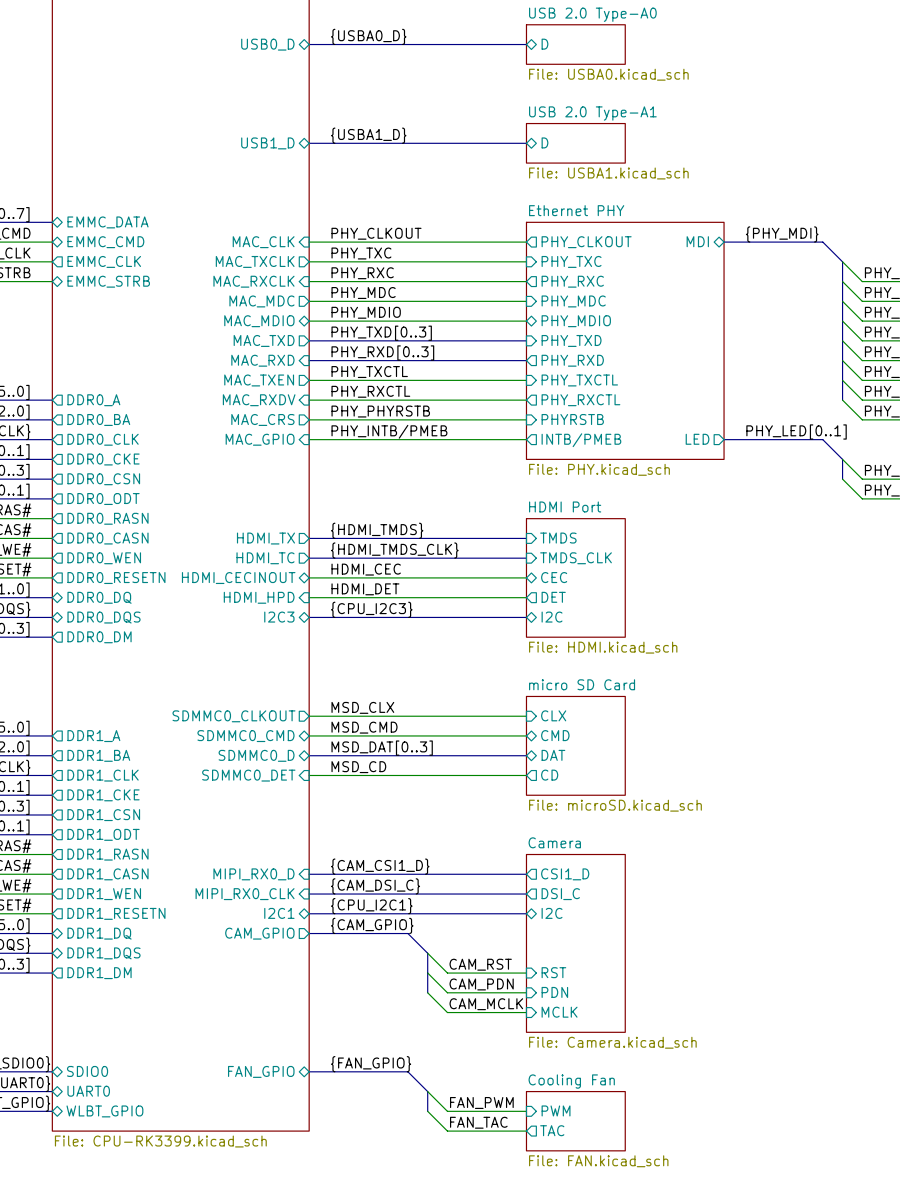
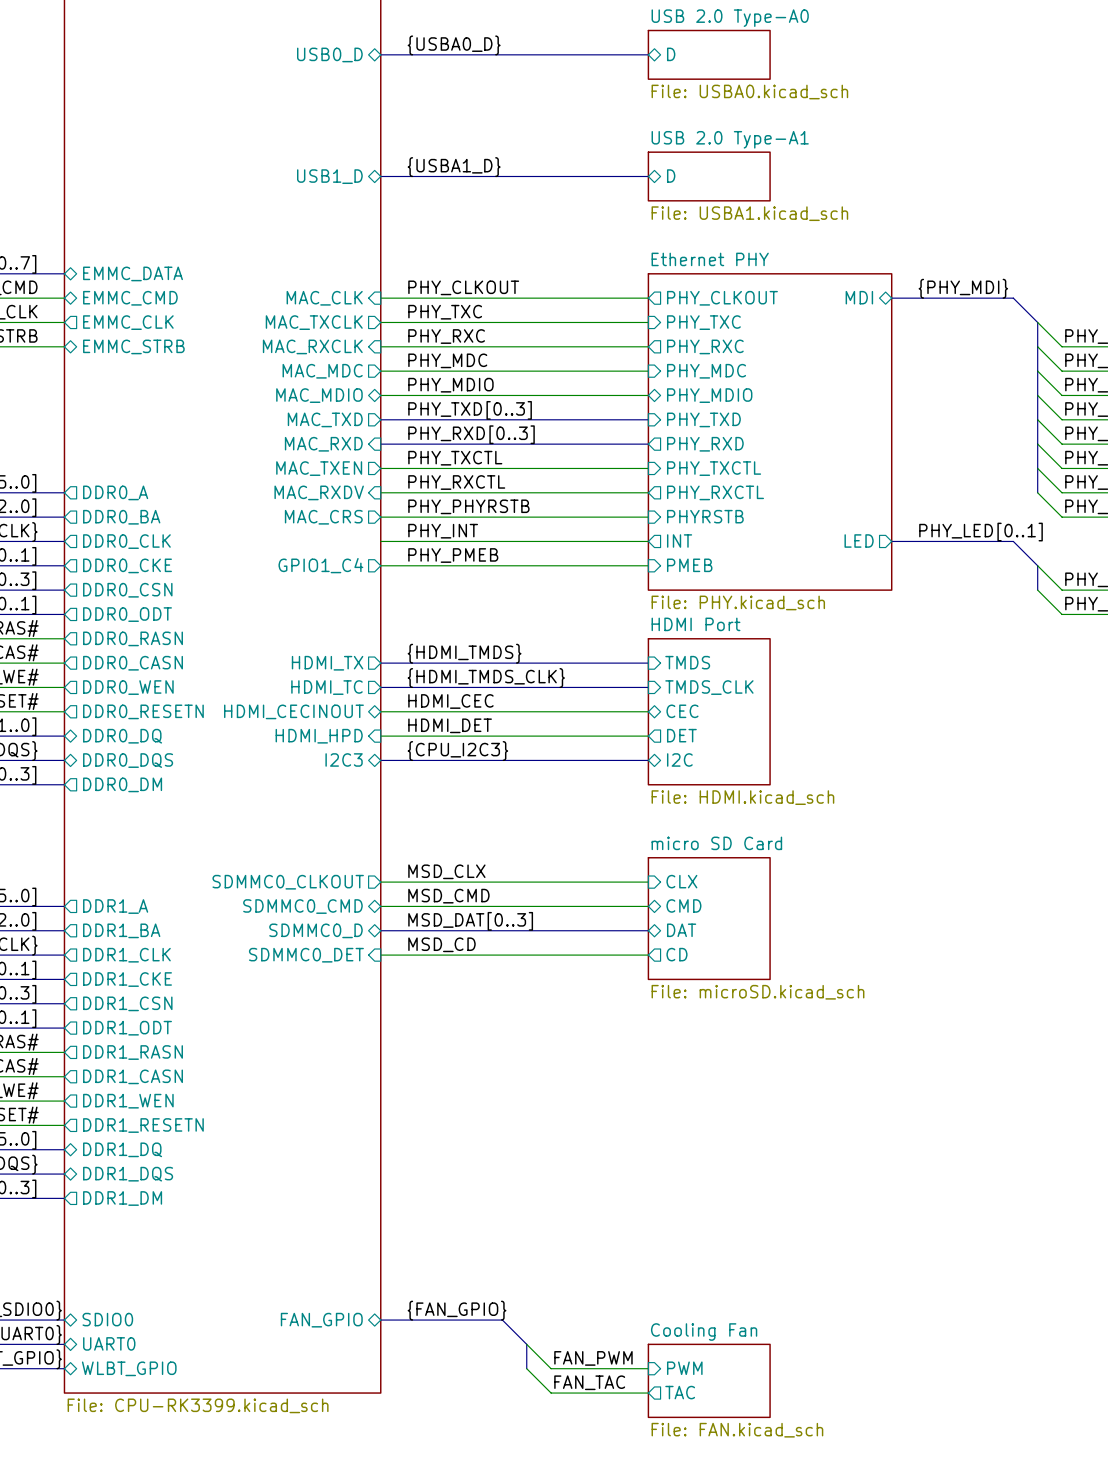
sheet Ethernet PHY: File: PHY.kicad_sch (625, 340) -> none
sheet Ethernet PHY: none -> File: PHY.kicad_sch (770, 431)
label: PHY_INTB/PMEB (389, 431) -> PHY_INT (443, 531)
sheet pin: MAC_GPIO (260, 439) -> none
sheet pin: INTB/PMEB (581, 440) -> INT (679, 541)
label: none -> PHY_PMEB (453, 555)
sheet pin: none -> GPIO1_C4 (320, 565)
wire: none -> (380, 565) (648, 565)
sheet pin: none -> PMEB (689, 565)
label: {CAM_CSI1_D} (380, 866) -> none
sheet pin: MIPI_RX0_D (253, 874) -> none
bus: (309, 874) (526, 874) -> none
sheet pin: CSI1_D (565, 874) -> none
label: {CAM_DSI_C} (375, 886) -> none
sheet pin: MIPI_RX0_CLK (245, 894) -> none
bus: (309, 894) (526, 894) -> none
sheet pin: DSI_C (560, 894) -> none
label: {CPU_I2C1} (371, 906) -> none
sheet pin: I2C1 (279, 913) -> none
bus: (309, 913) (526, 913) -> none
sheet pin: I2C (552, 913) -> none
label: {CAM_GPIO} (372, 925) -> none
sheet pin: CAM_GPIO (259, 933) -> none
bus: (309, 933) (407, 933) (427, 953) (427, 992) -> none
sheet Camera: File: Camera.kicad_sch (575, 943) -> none
wire: (427, 953) (447, 973) (526, 973) -> none
label: CAM_RST (480, 964) -> none
sheet pin: RST (553, 972) -> none
wire: (427, 973) (447, 992) (526, 992) -> none
label: CAM_PDN (481, 984) -> none
wire: (427, 992) (447, 1012) (526, 1012) -> none
sheet pin: PDN (554, 992) -> none
label: CAM_MCLK (486, 1004) -> none
sheet pin: MCLK (559, 1012) -> none

